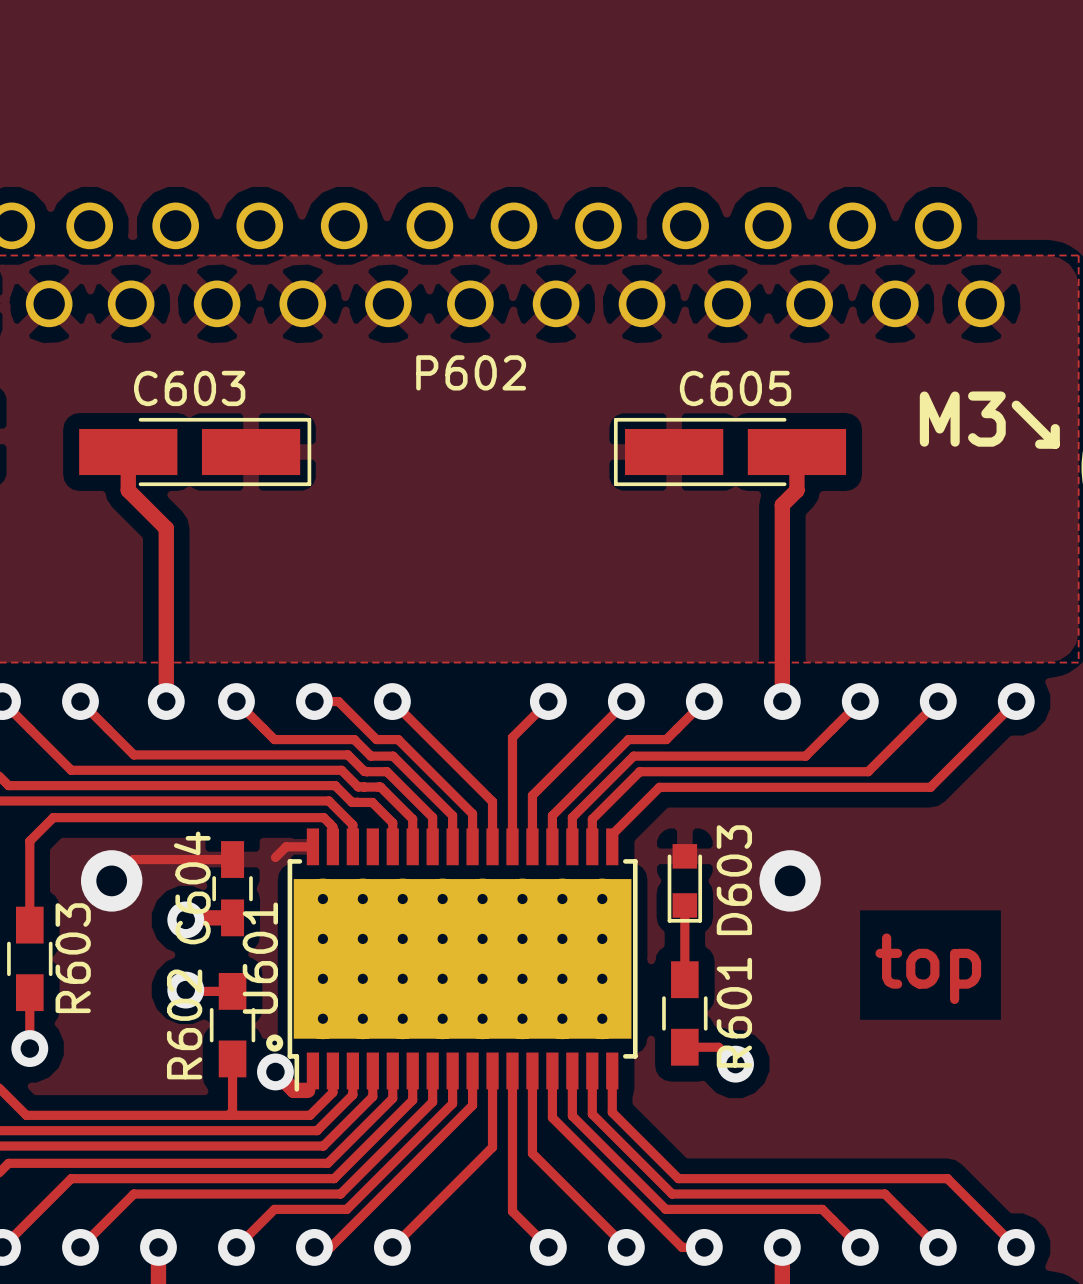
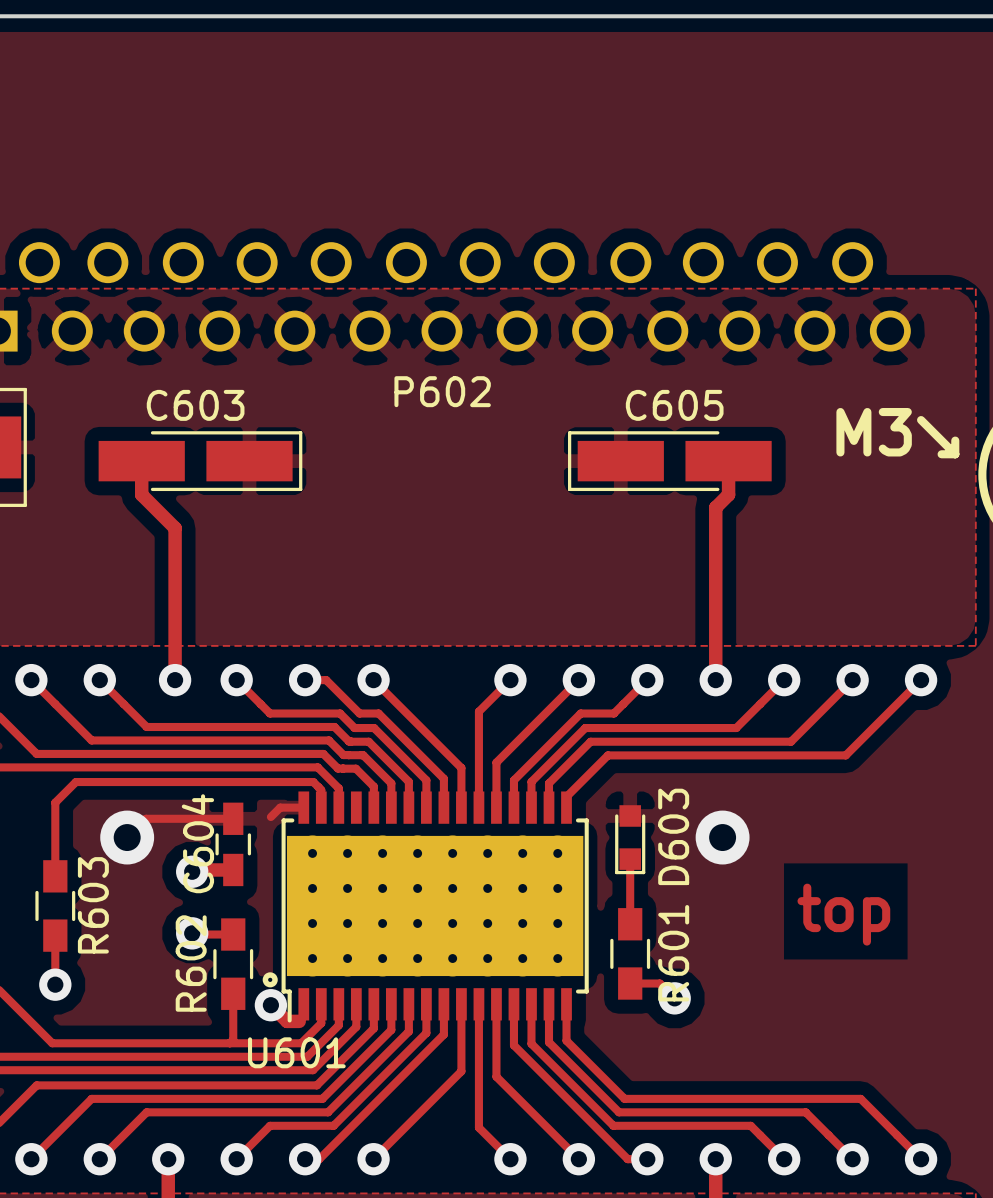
U601 name rotation: 0° (260, 958) -> 90° clockwise (296, 1052)
U601 name position: U601 (260, 958) -> U601 (296, 1052)

